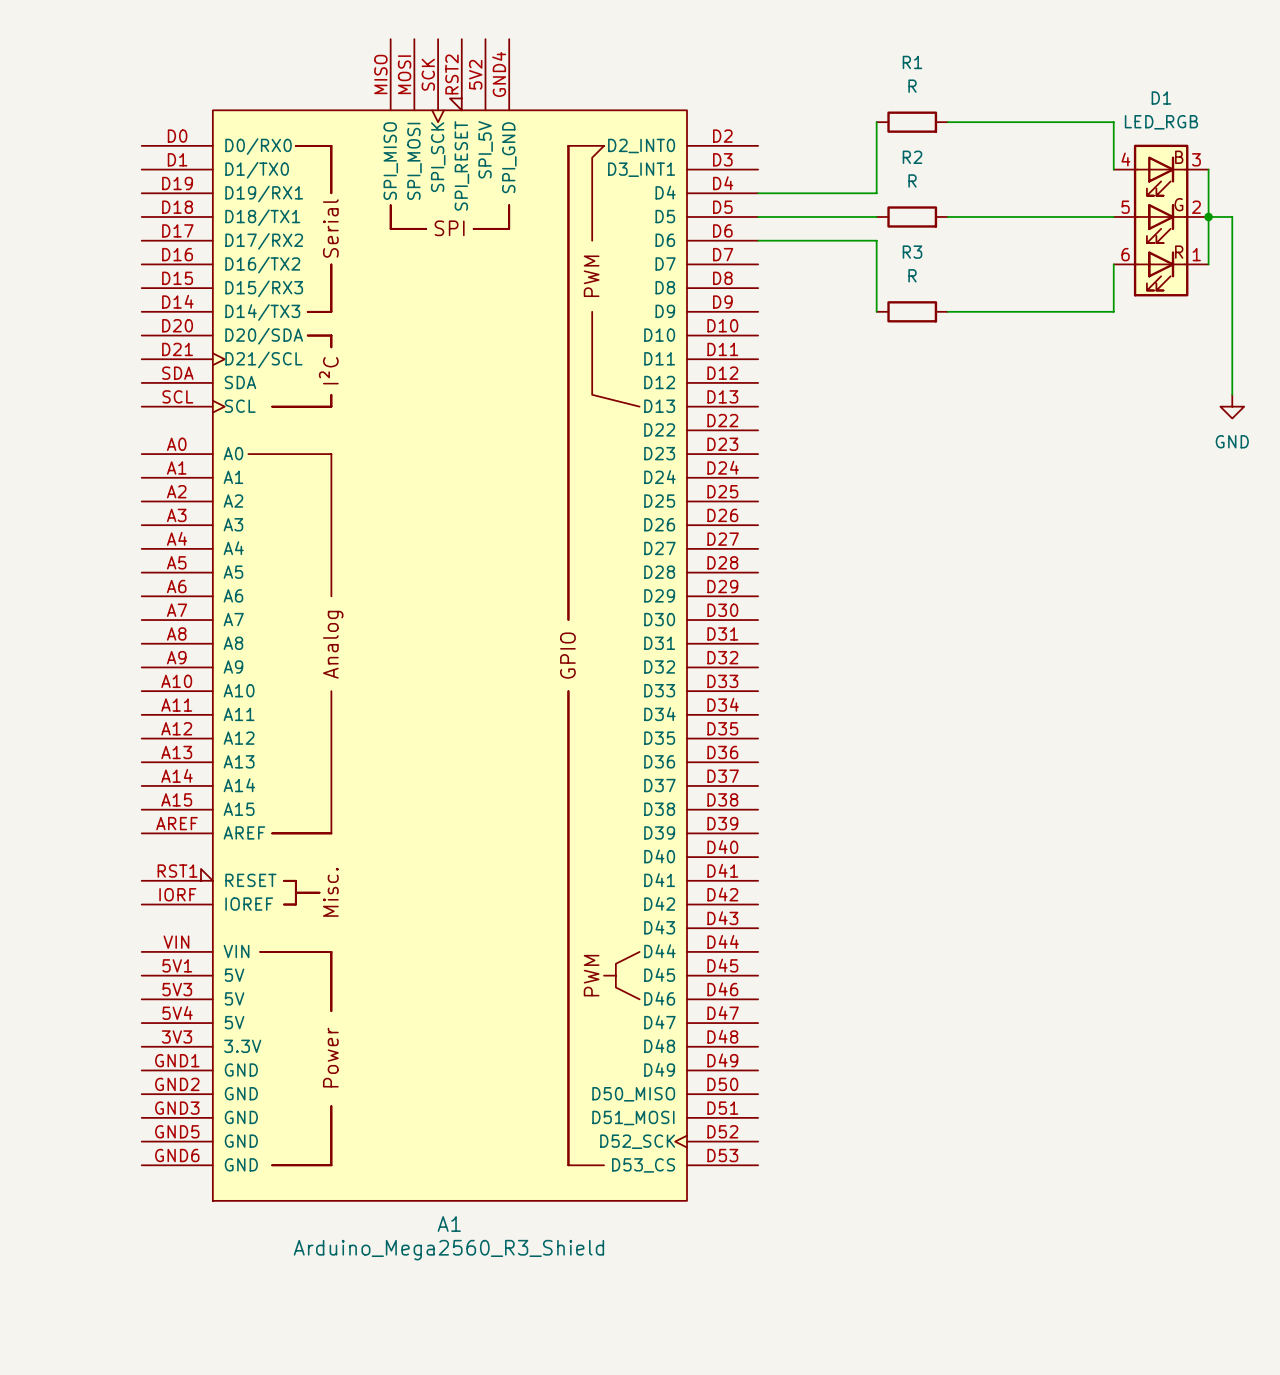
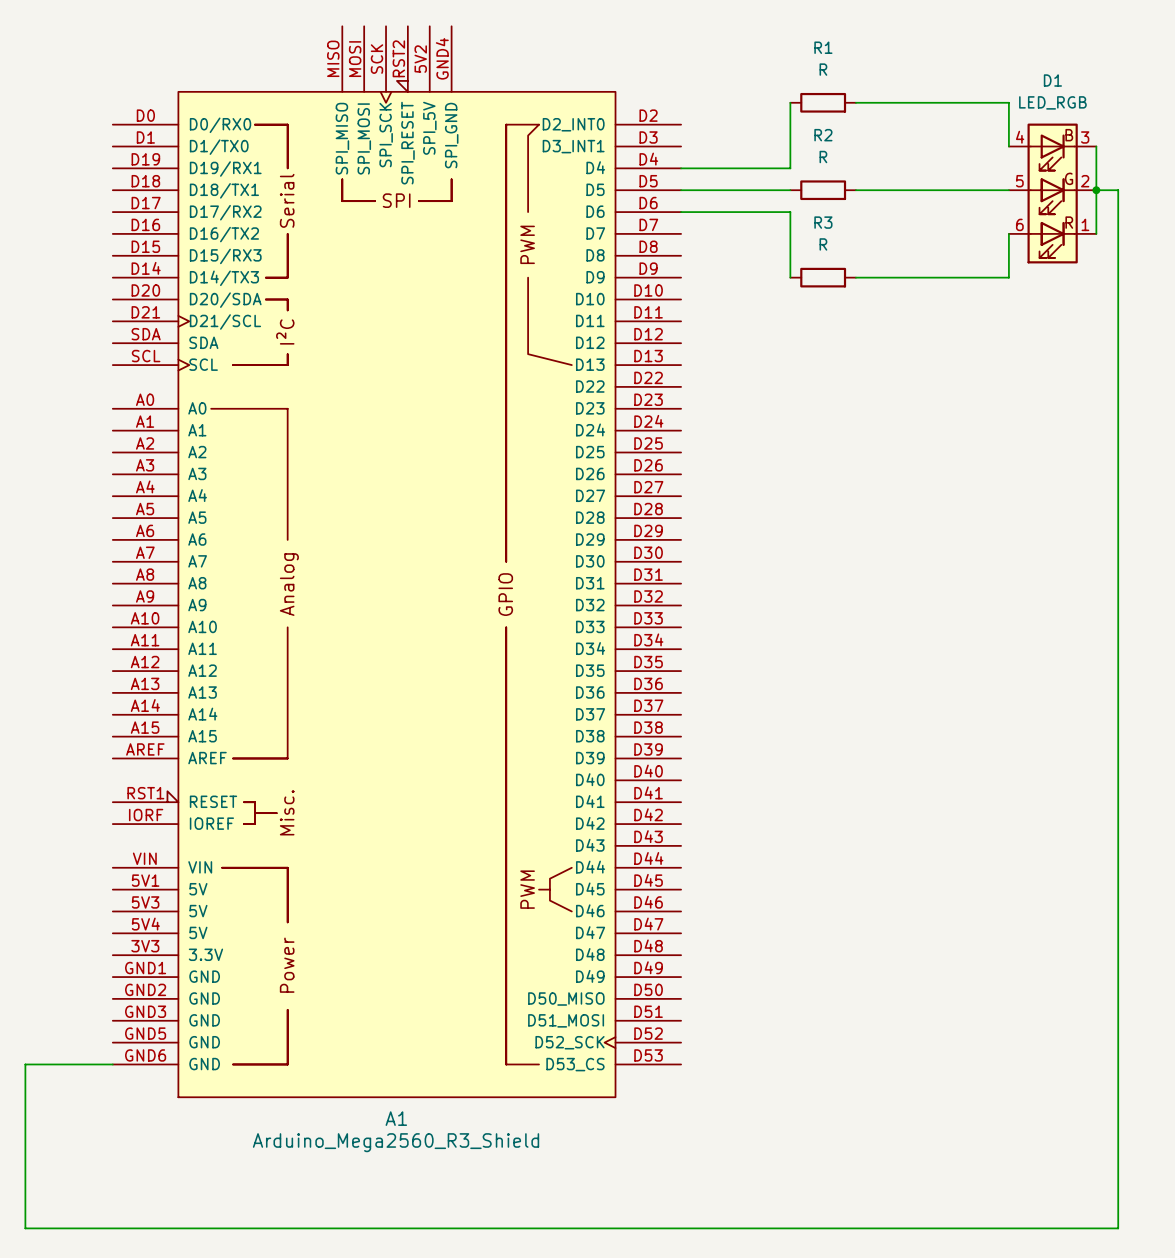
wire: none -> (1118, 354) (1118, 1228) (25, 1228) (25, 1064) (112, 1064)
power symbol: GND (1232, 406) -> none

